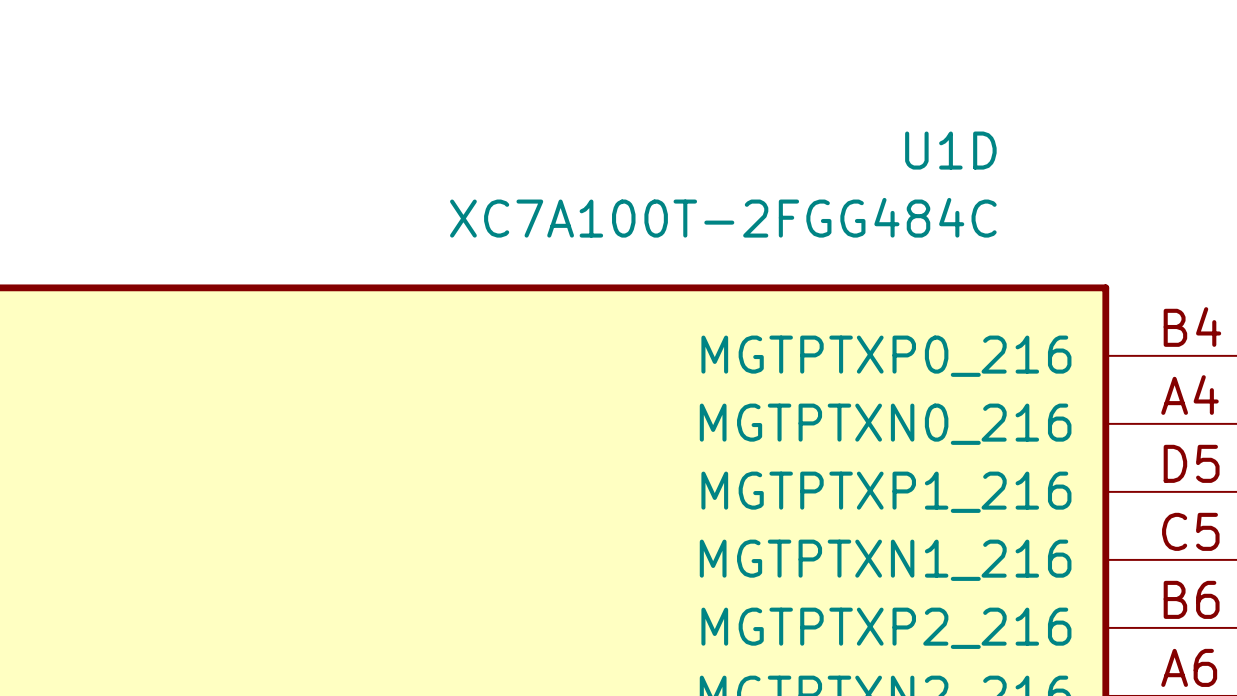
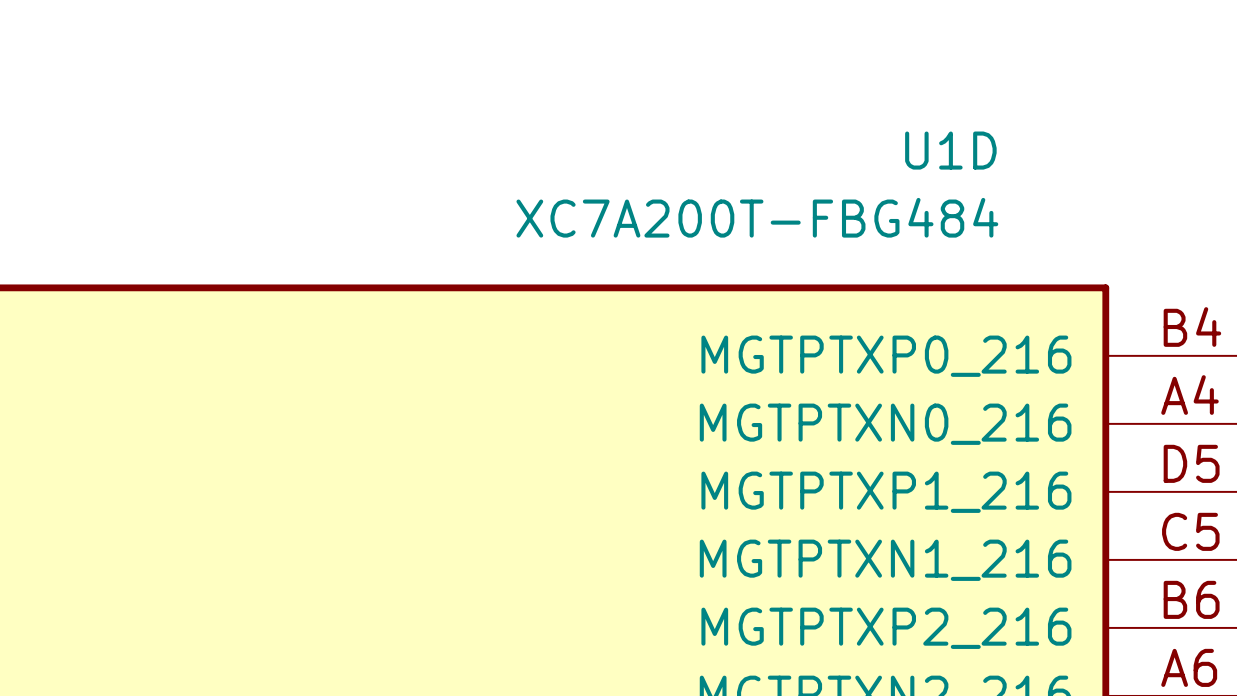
U1D value: XC7A100T-2FGG484C (723, 217) -> XC7A200T-FBG484 (757, 217)

